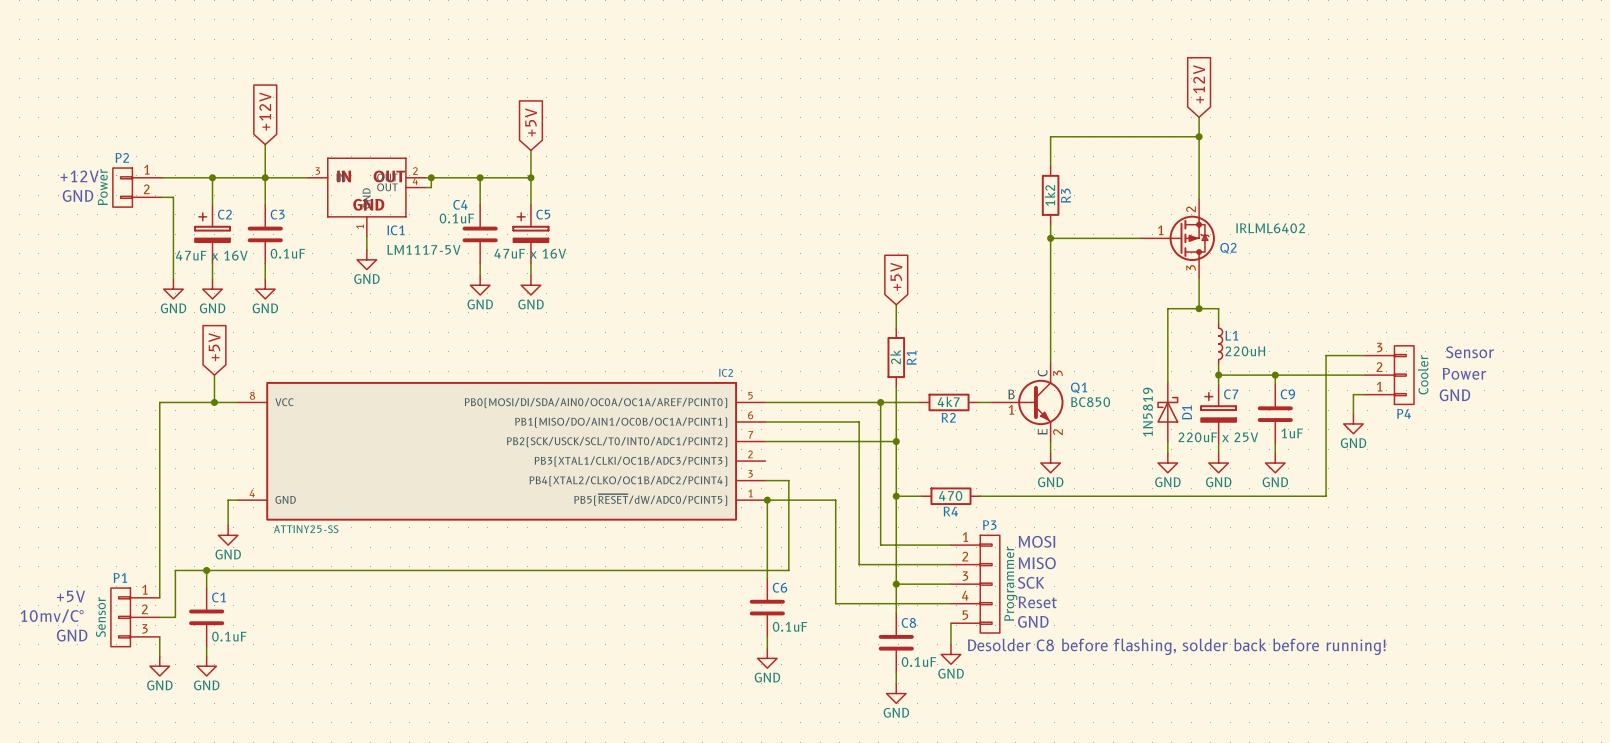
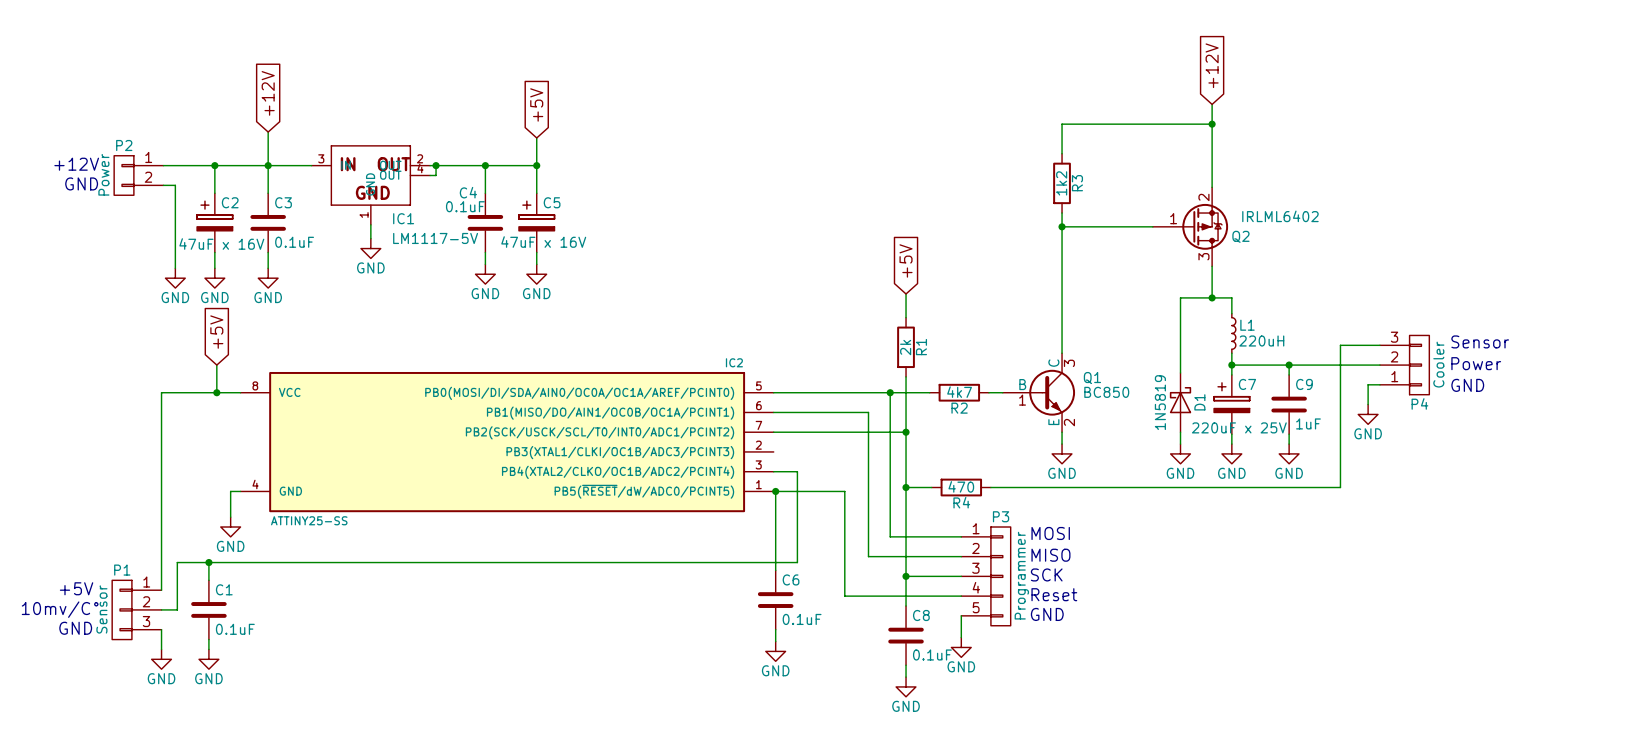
text: Desolder C8 before flashing, solder back before running! (1176, 646) -> none

